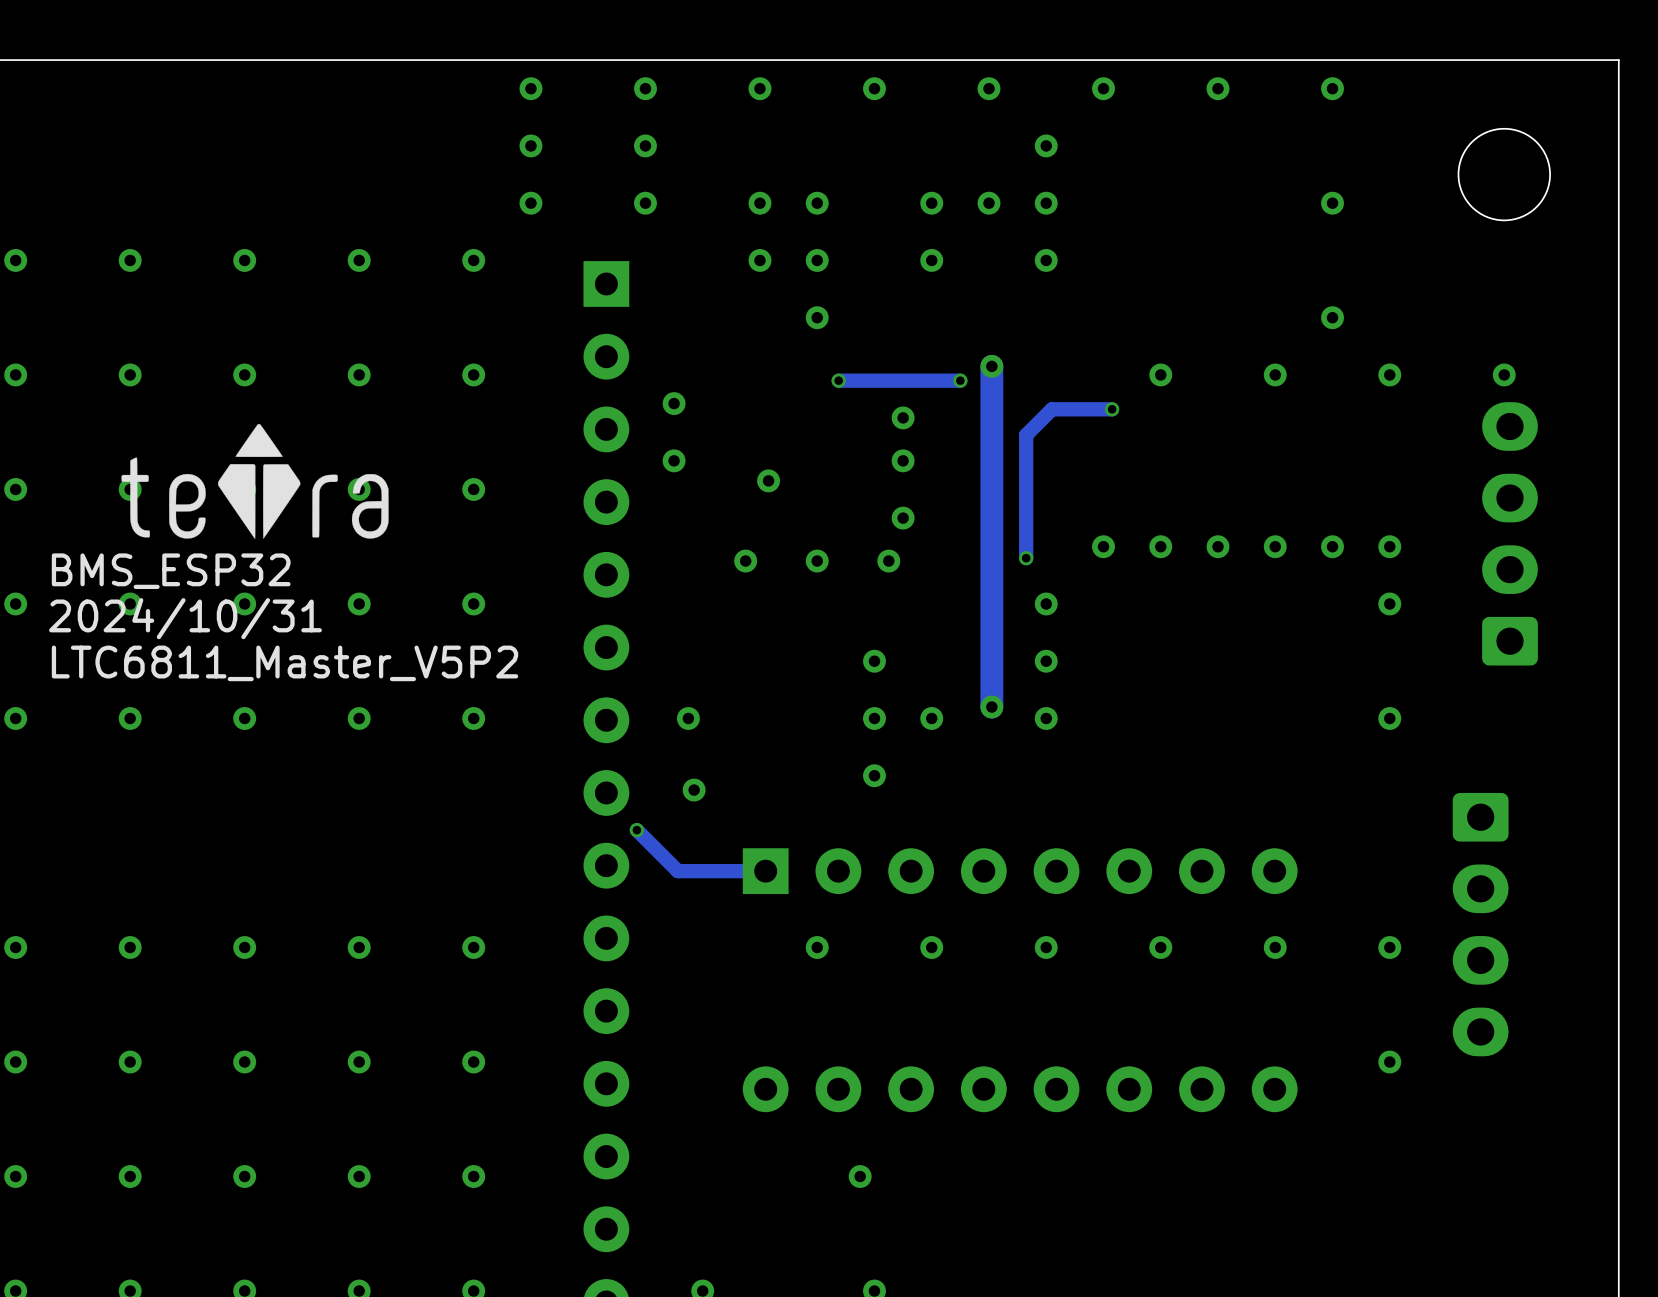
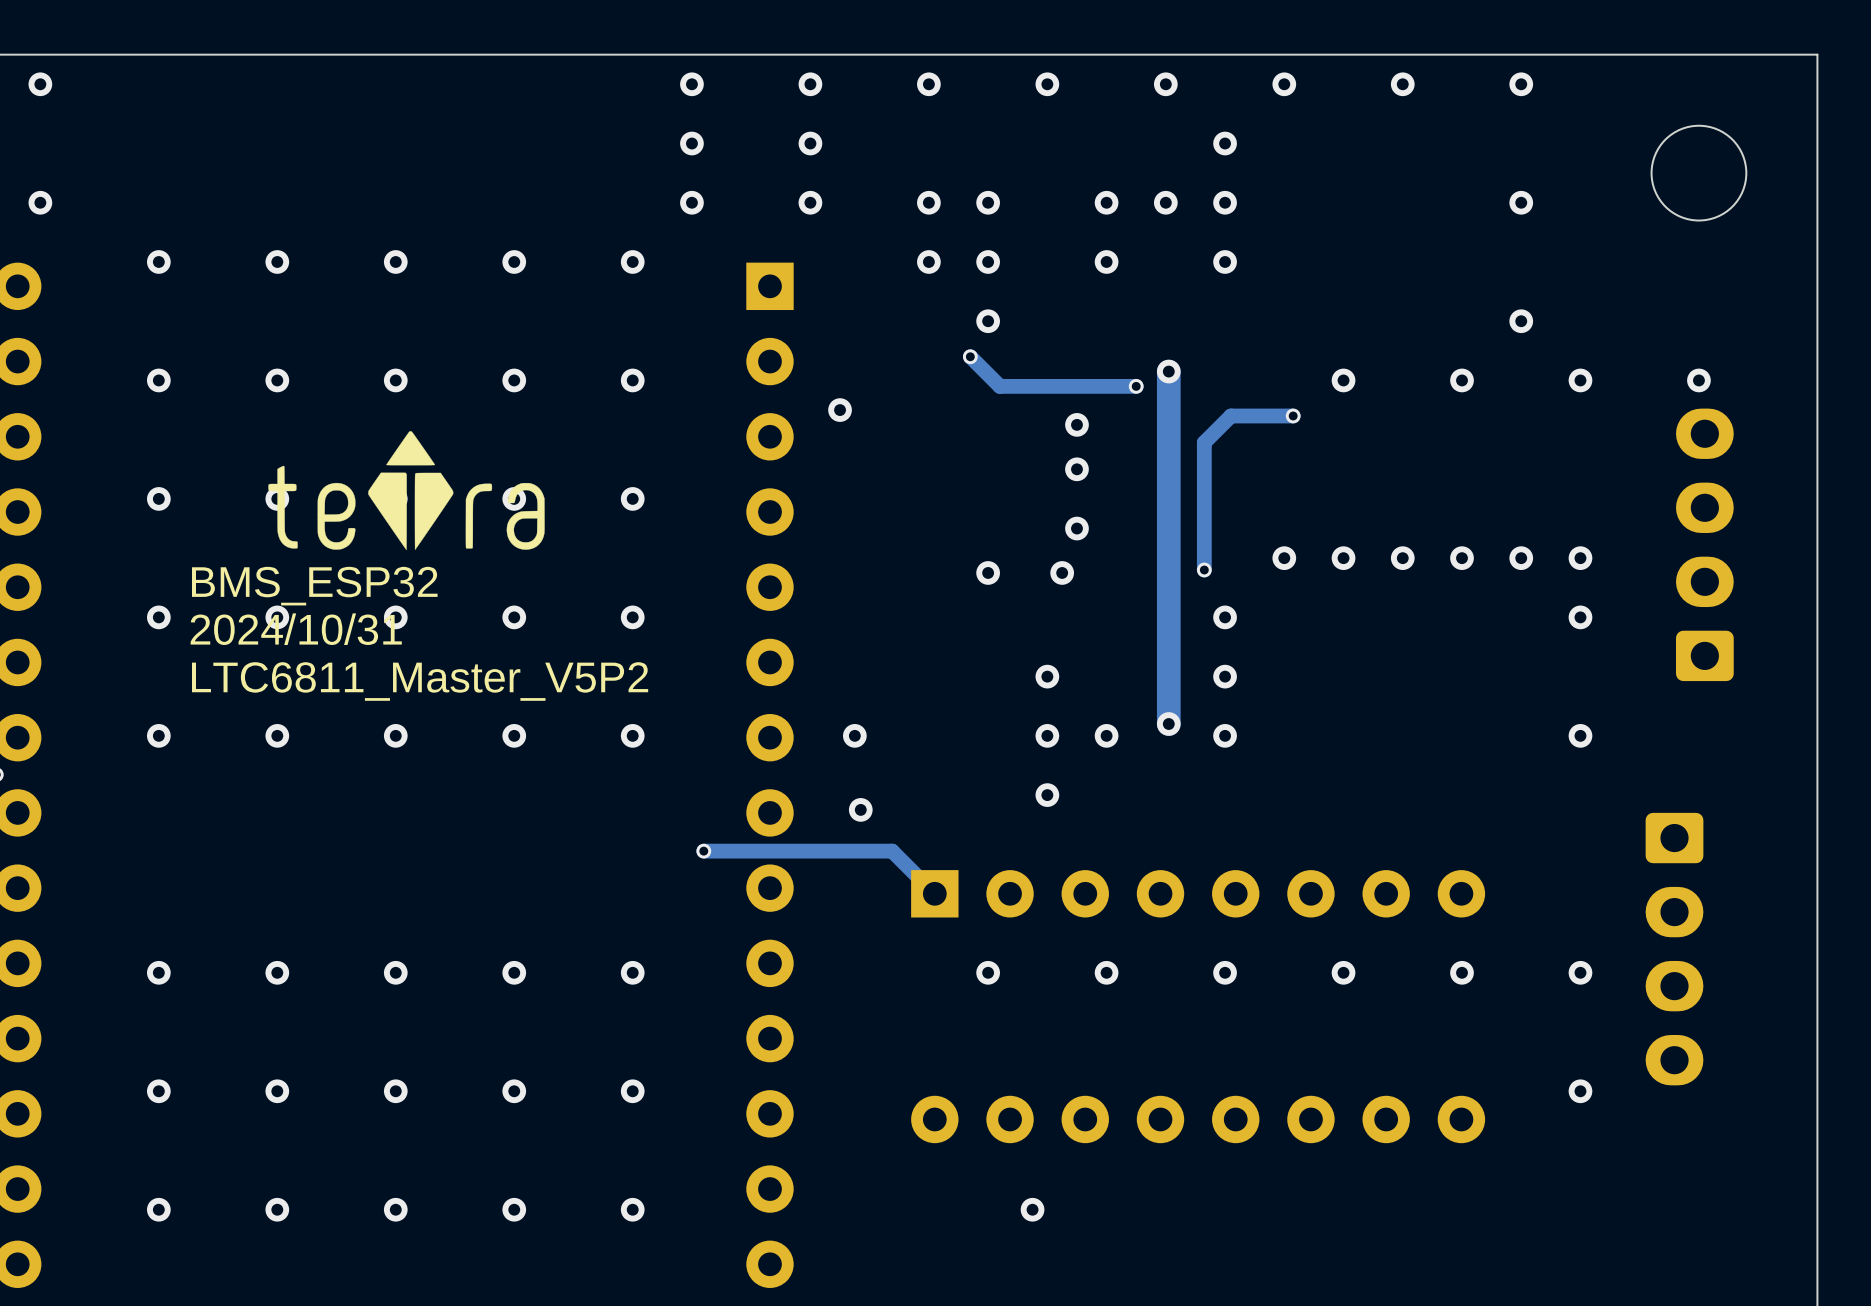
track: none -> (970, 356) (999, 386) (1010, 386)
via position: (838, 380) -> (970, 356)
via: (674, 460) -> none
via: (768, 480) -> none
via: (745, 561) -> none
track: (636, 830) (677, 871) (765, 871) -> (703, 851) (892, 851) (934, 893)
via position: (636, 830) -> (703, 851)

